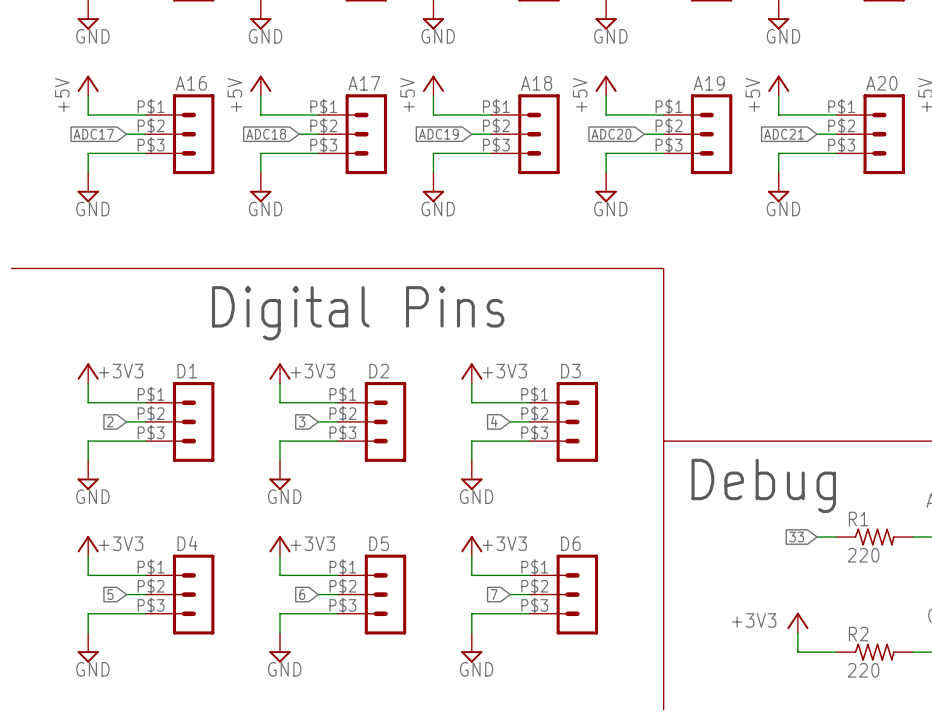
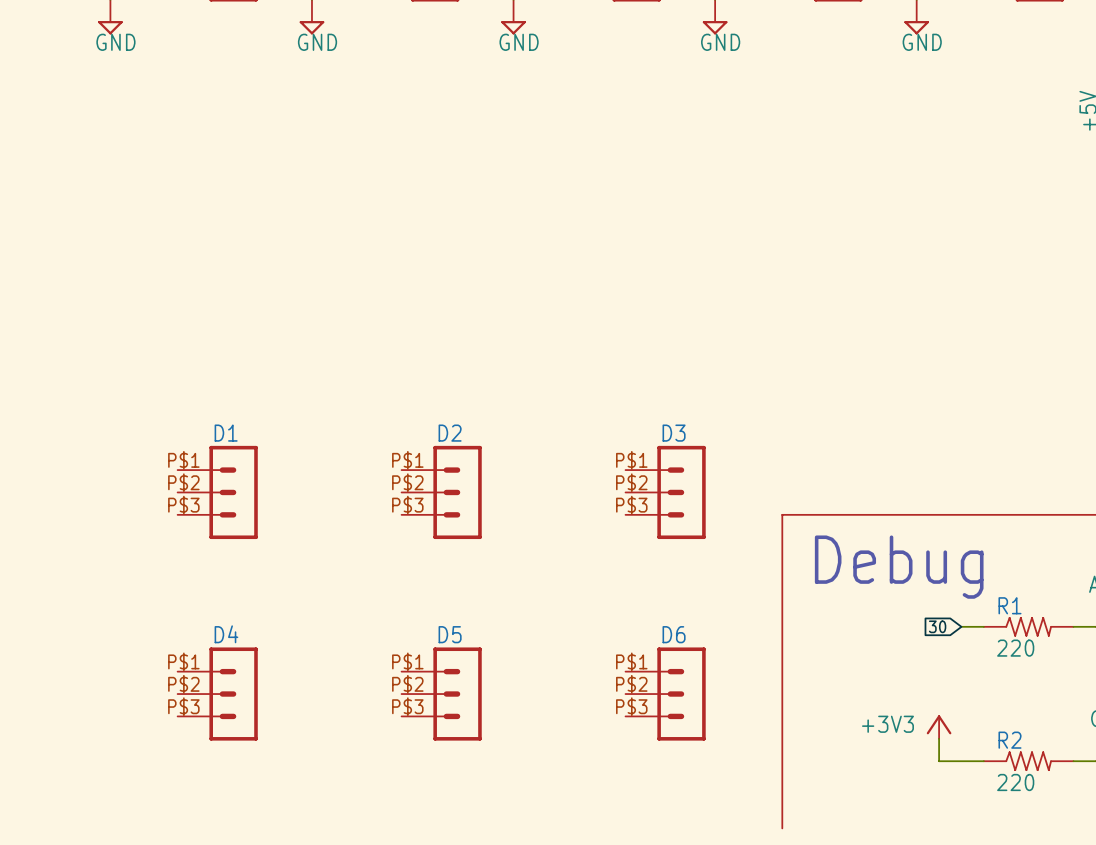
power symbol: +5V (88, 85) -> none
power symbol: +5V (260, 85) -> none
power symbol: +5V (433, 85) -> none
power symbol: +5V (606, 85) -> none
power symbol: +5V (778, 85) -> none
wire: (88, 95) (88, 115) (145, 115) -> none
wire: (260, 95) (260, 115) (318, 115) -> none
wire: (433, 95) (433, 115) (491, 115) -> none
wire: (606, 95) (606, 115) (663, 115) -> none
wire: (778, 95) (778, 115) (836, 115) -> none
global label: ADC17 (93, 134) -> none
wire: (126, 134) (145, 134) -> none
A16: (180, 134) -> none
global label: ADC18 (266, 134) -> none
wire: (299, 134) (318, 134) -> none
A17: (352, 134) -> none
global label: ADC19 (438, 134) -> none
wire: (471, 134) (491, 134) -> none
A18: (525, 134) -> none
global label: ADC20 (611, 134) -> none
wire: (644, 134) (663, 134) -> none
A19: (697, 134) -> none
global label: ADC21 (784, 134) -> none
wire: (817, 134) (836, 134) -> none
A20: (870, 134) -> none
wire: (145, 153) (88, 153) (88, 172) -> none
wire: (318, 153) (260, 153) (260, 172) -> none
wire: (491, 153) (433, 153) (433, 172) -> none
wire: (663, 153) (606, 153) (606, 172) -> none
wire: (836, 153) (778, 153) (778, 172) -> none
power symbol: GND (88, 187) -> none
power symbol: GND (260, 187) -> none
power symbol: GND (433, 187) -> none
power symbol: GND (606, 187) -> none
power symbol: GND (778, 187) -> none
line: (11, 268) (663, 268) (663, 441) -> none
text: Digital Pins (358, 313) -> none
power symbol: +3V3 (88, 373) -> none
power symbol: +3V3 (280, 373) -> none
power symbol: +3V3 (471, 373) -> none
wire: (88, 383) (88, 402) (145, 402) -> none
wire: (280, 383) (280, 402) (337, 402) -> none
wire: (471, 383) (471, 402) (529, 402) -> none
global label: 2 (110, 421) -> none
wire: (126, 421) (145, 421) -> none
global label: 3 (302, 421) -> none
wire: (318, 421) (337, 421) -> none
global label: 4 (494, 421) -> none
wire: (510, 421) (529, 421) -> none
wire: (145, 441) (88, 441) (88, 460) -> none
wire: (337, 441) (280, 441) (280, 460) -> none
wire: (529, 441) (471, 441) (471, 460) -> none
power symbol: GND (88, 475) -> none
power symbol: GND (280, 475) -> none
power symbol: GND (471, 475) -> none
global label: 33 (796, 537) -> 30 (937, 626)
power symbol: +3V3 (88, 546) -> none
power symbol: +3V3 (280, 546) -> none
power symbol: +3V3 (471, 546) -> none
wire: (88, 556) (88, 575) (145, 575) -> none
wire: (280, 556) (280, 575) (337, 575) -> none
wire: (471, 556) (471, 575) (529, 575) -> none
global label: 5 (110, 594) -> none
wire: (126, 594) (145, 594) -> none
global label: 6 (302, 594) -> none
wire: (318, 594) (337, 594) -> none
global label: 7 (494, 594) -> none
wire: (510, 594) (529, 594) -> none
wire: (145, 613) (88, 613) (88, 632) -> none
wire: (337, 613) (280, 613) (280, 632) -> none
wire: (529, 613) (471, 613) (471, 632) -> none
power symbol: GND (88, 647) -> none
power symbol: GND (280, 647) -> none
power symbol: GND (471, 647) -> none

